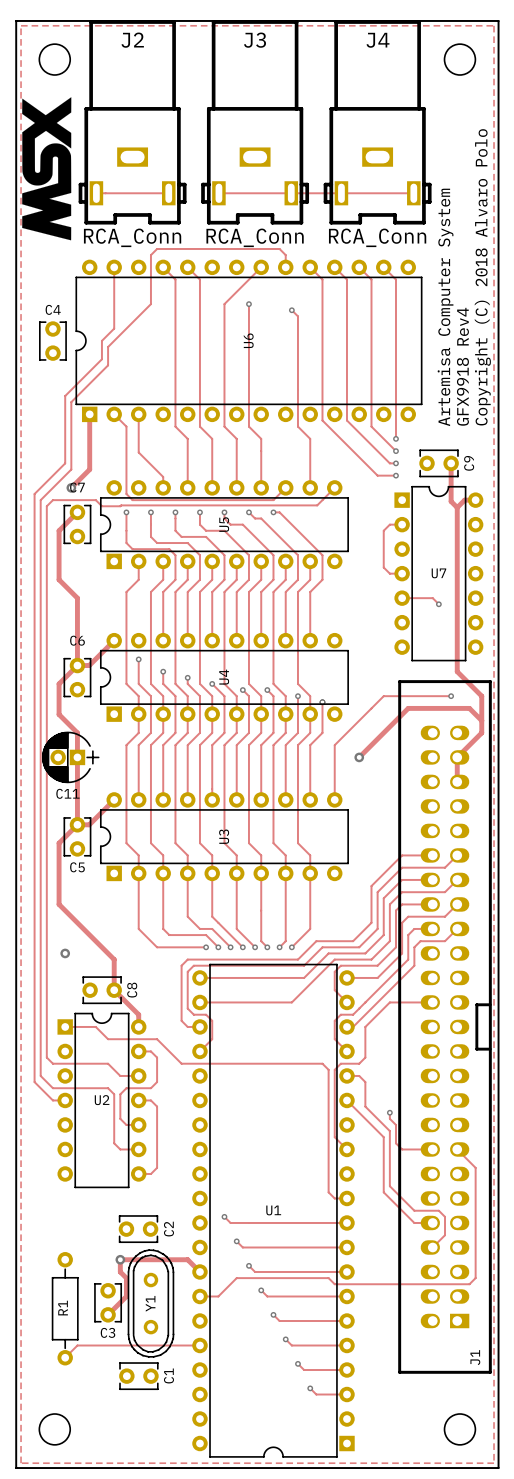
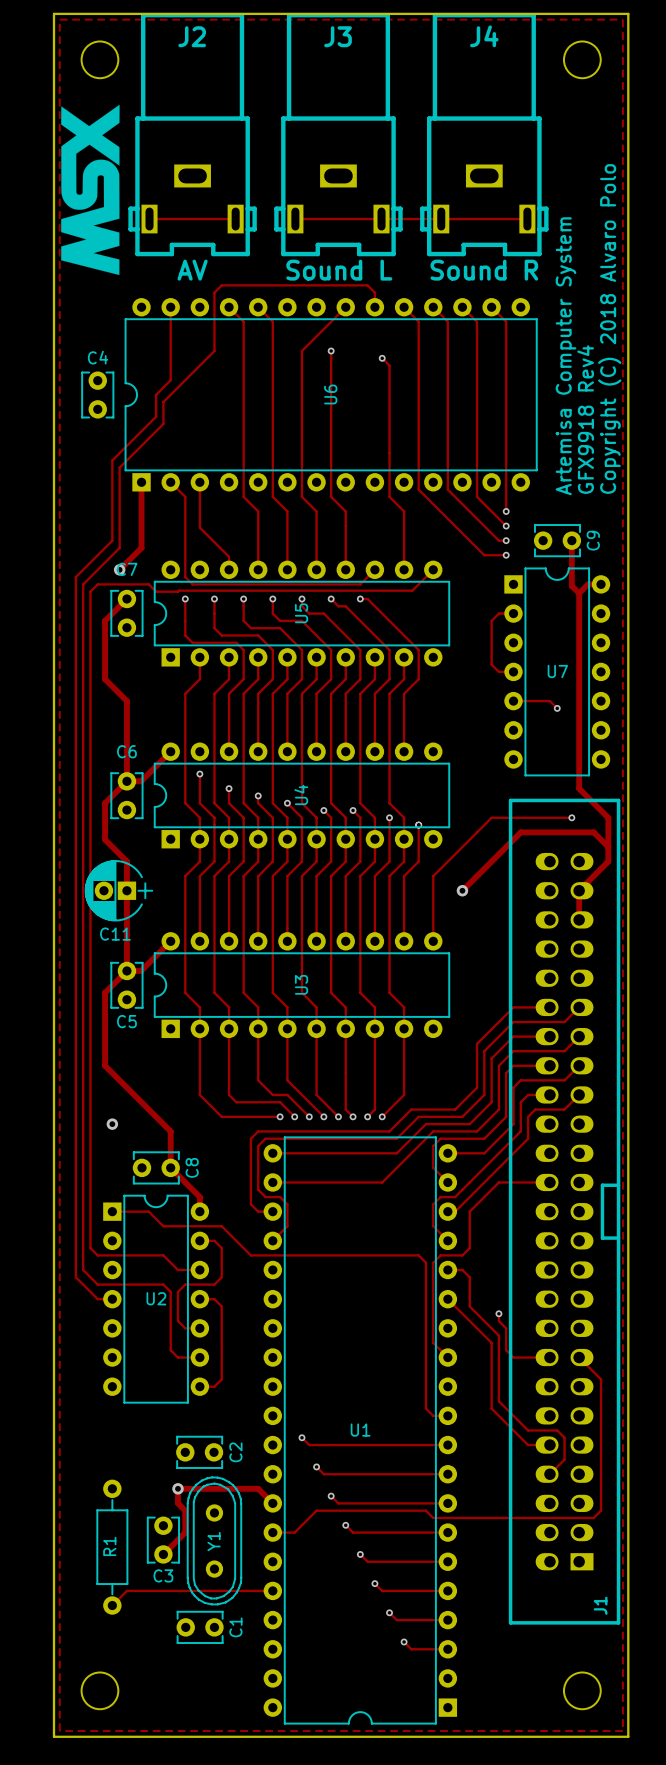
J2 value: RCA_Conn (132, 237) -> AV (192, 270)
J3 value: RCA_Conn (255, 237) -> Sound L (339, 270)
J4 value: RCA_Conn (377, 237) -> Sound R (484, 270)

